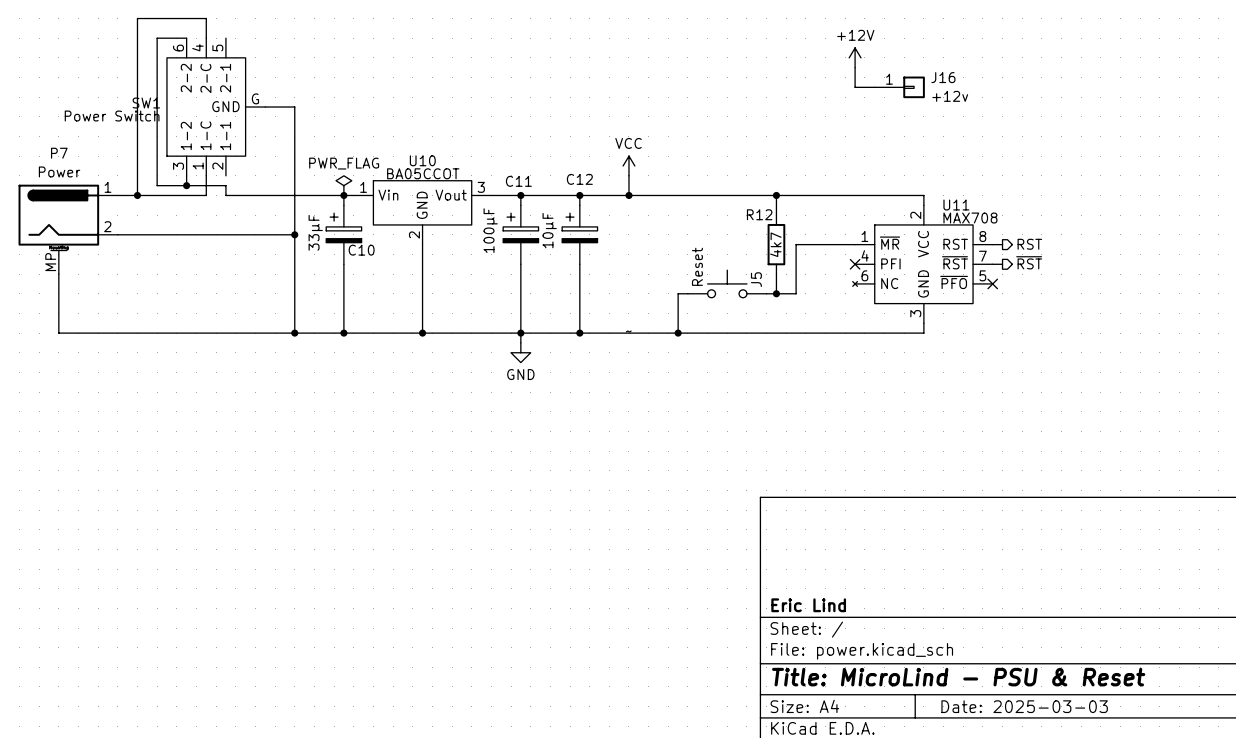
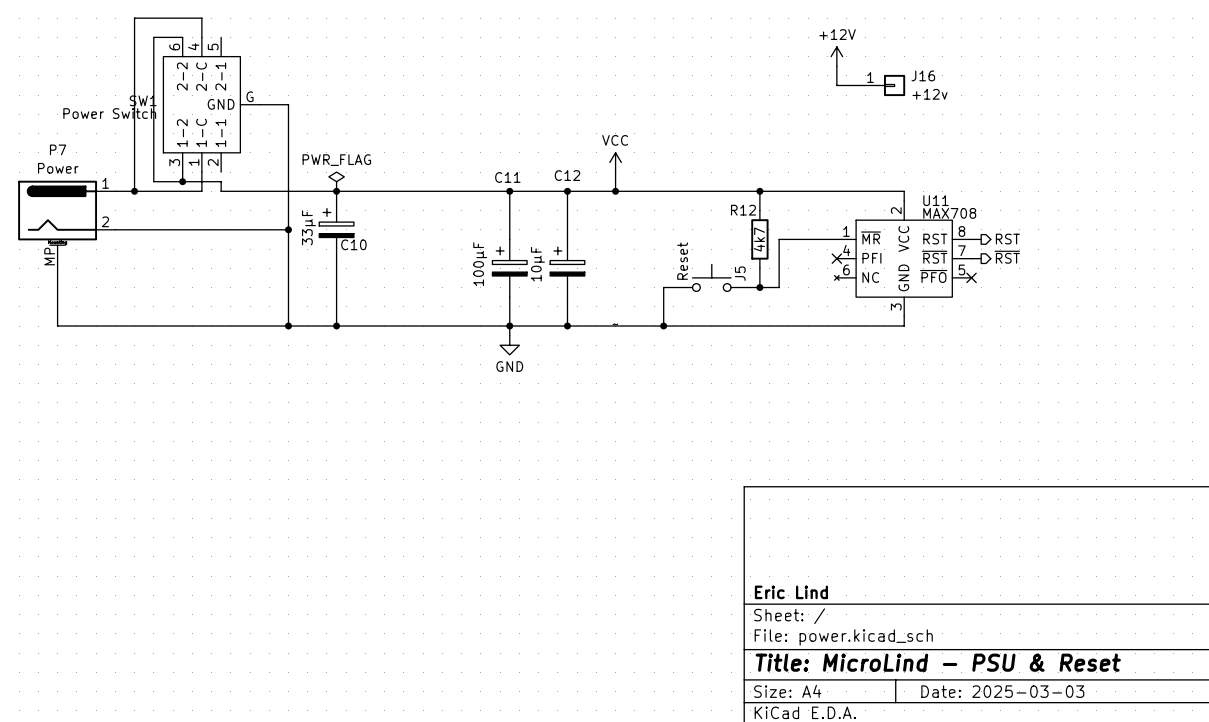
wire: none -> (346, 191) (480, 191)
U10: BA05CCOT (422, 212) -> none
C11 position: (520, 234) -> (509, 268)
C12 position: (579, 234) -> (567, 268)
wire: (422, 244) (422, 333) -> none
junction: (422, 333) -> none

